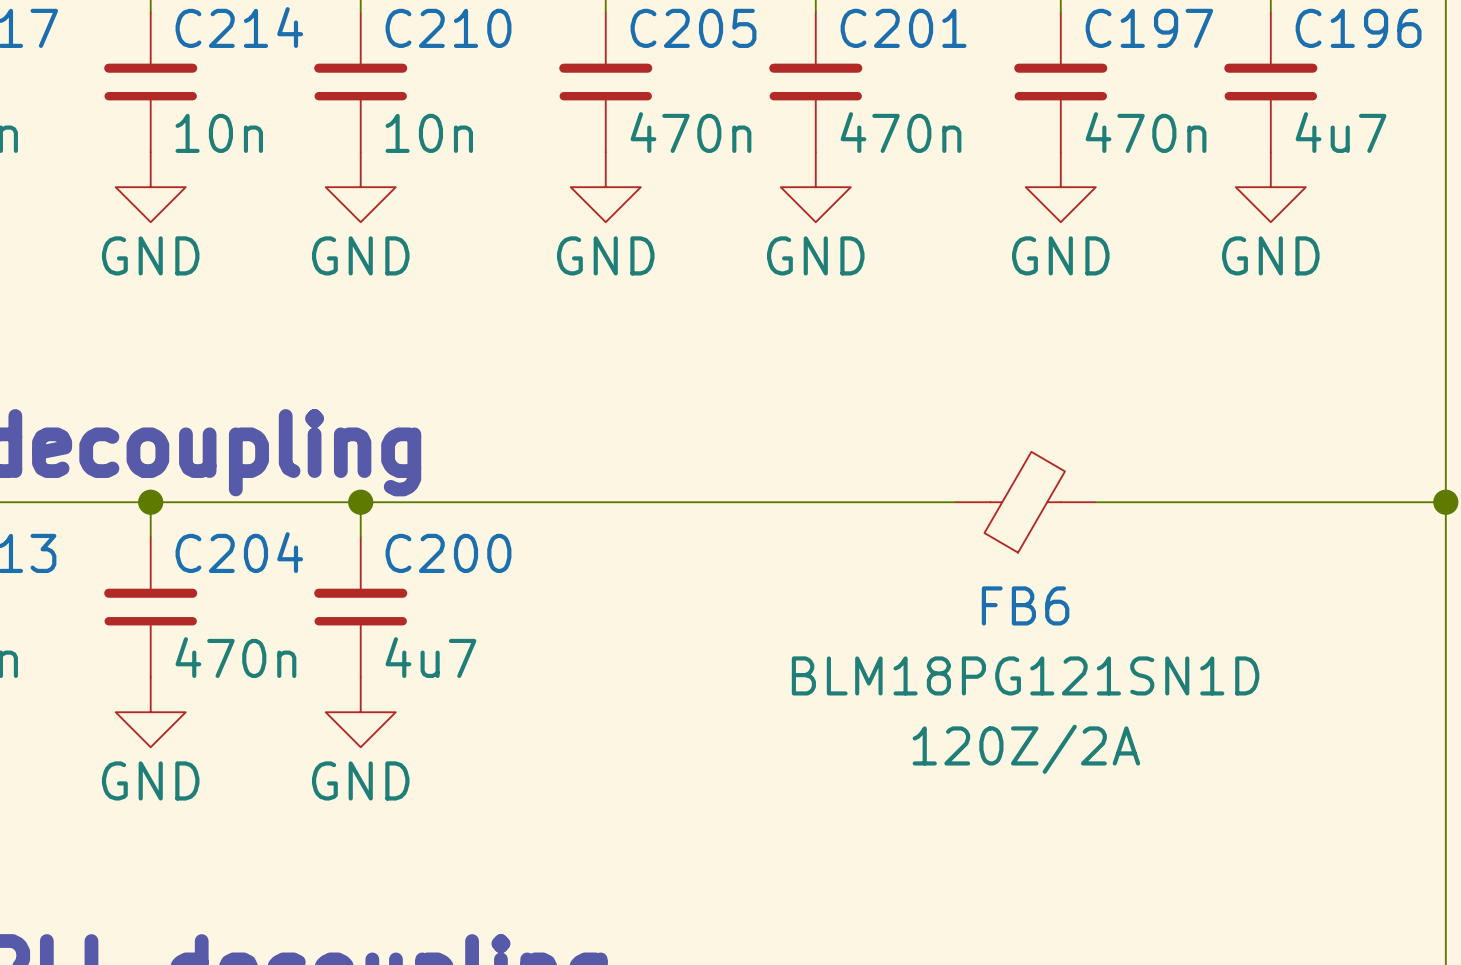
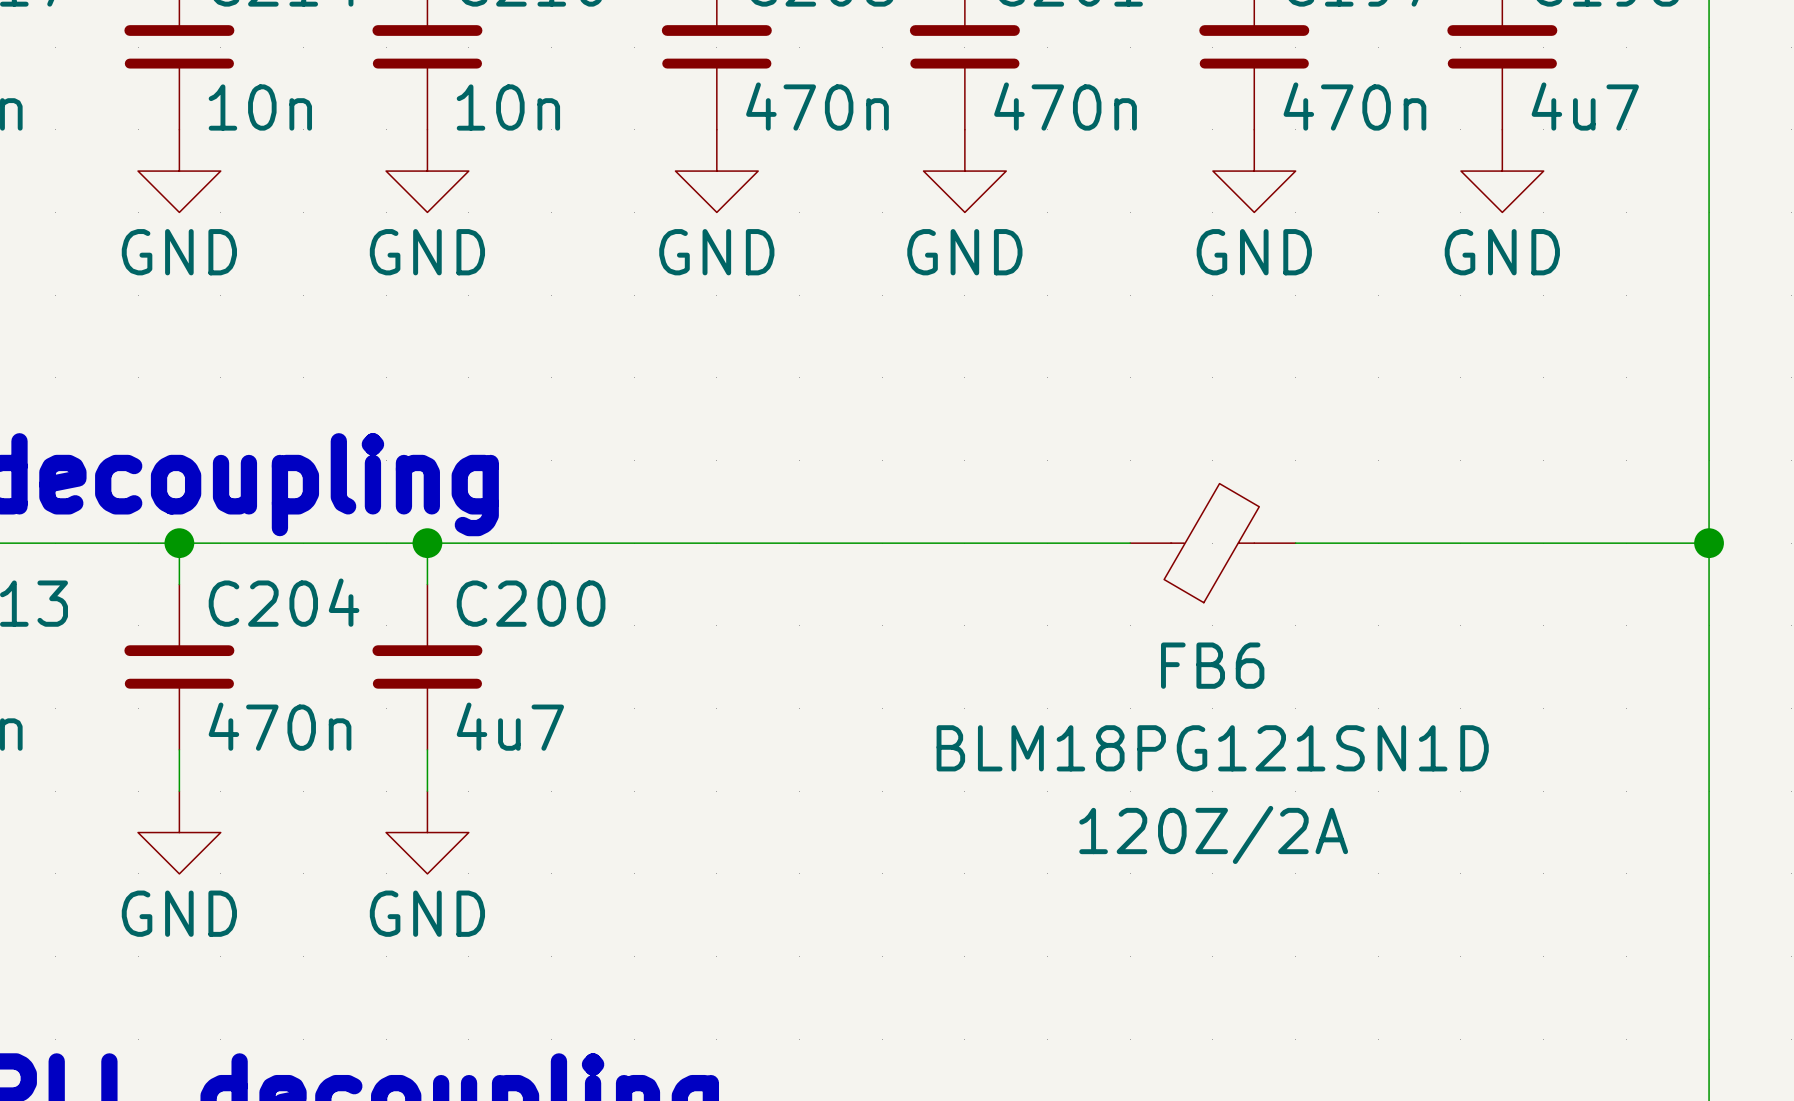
power symbol position: GND (150, 712) -> GND (179, 832)
power symbol position: GND (360, 712) -> GND (427, 832)

